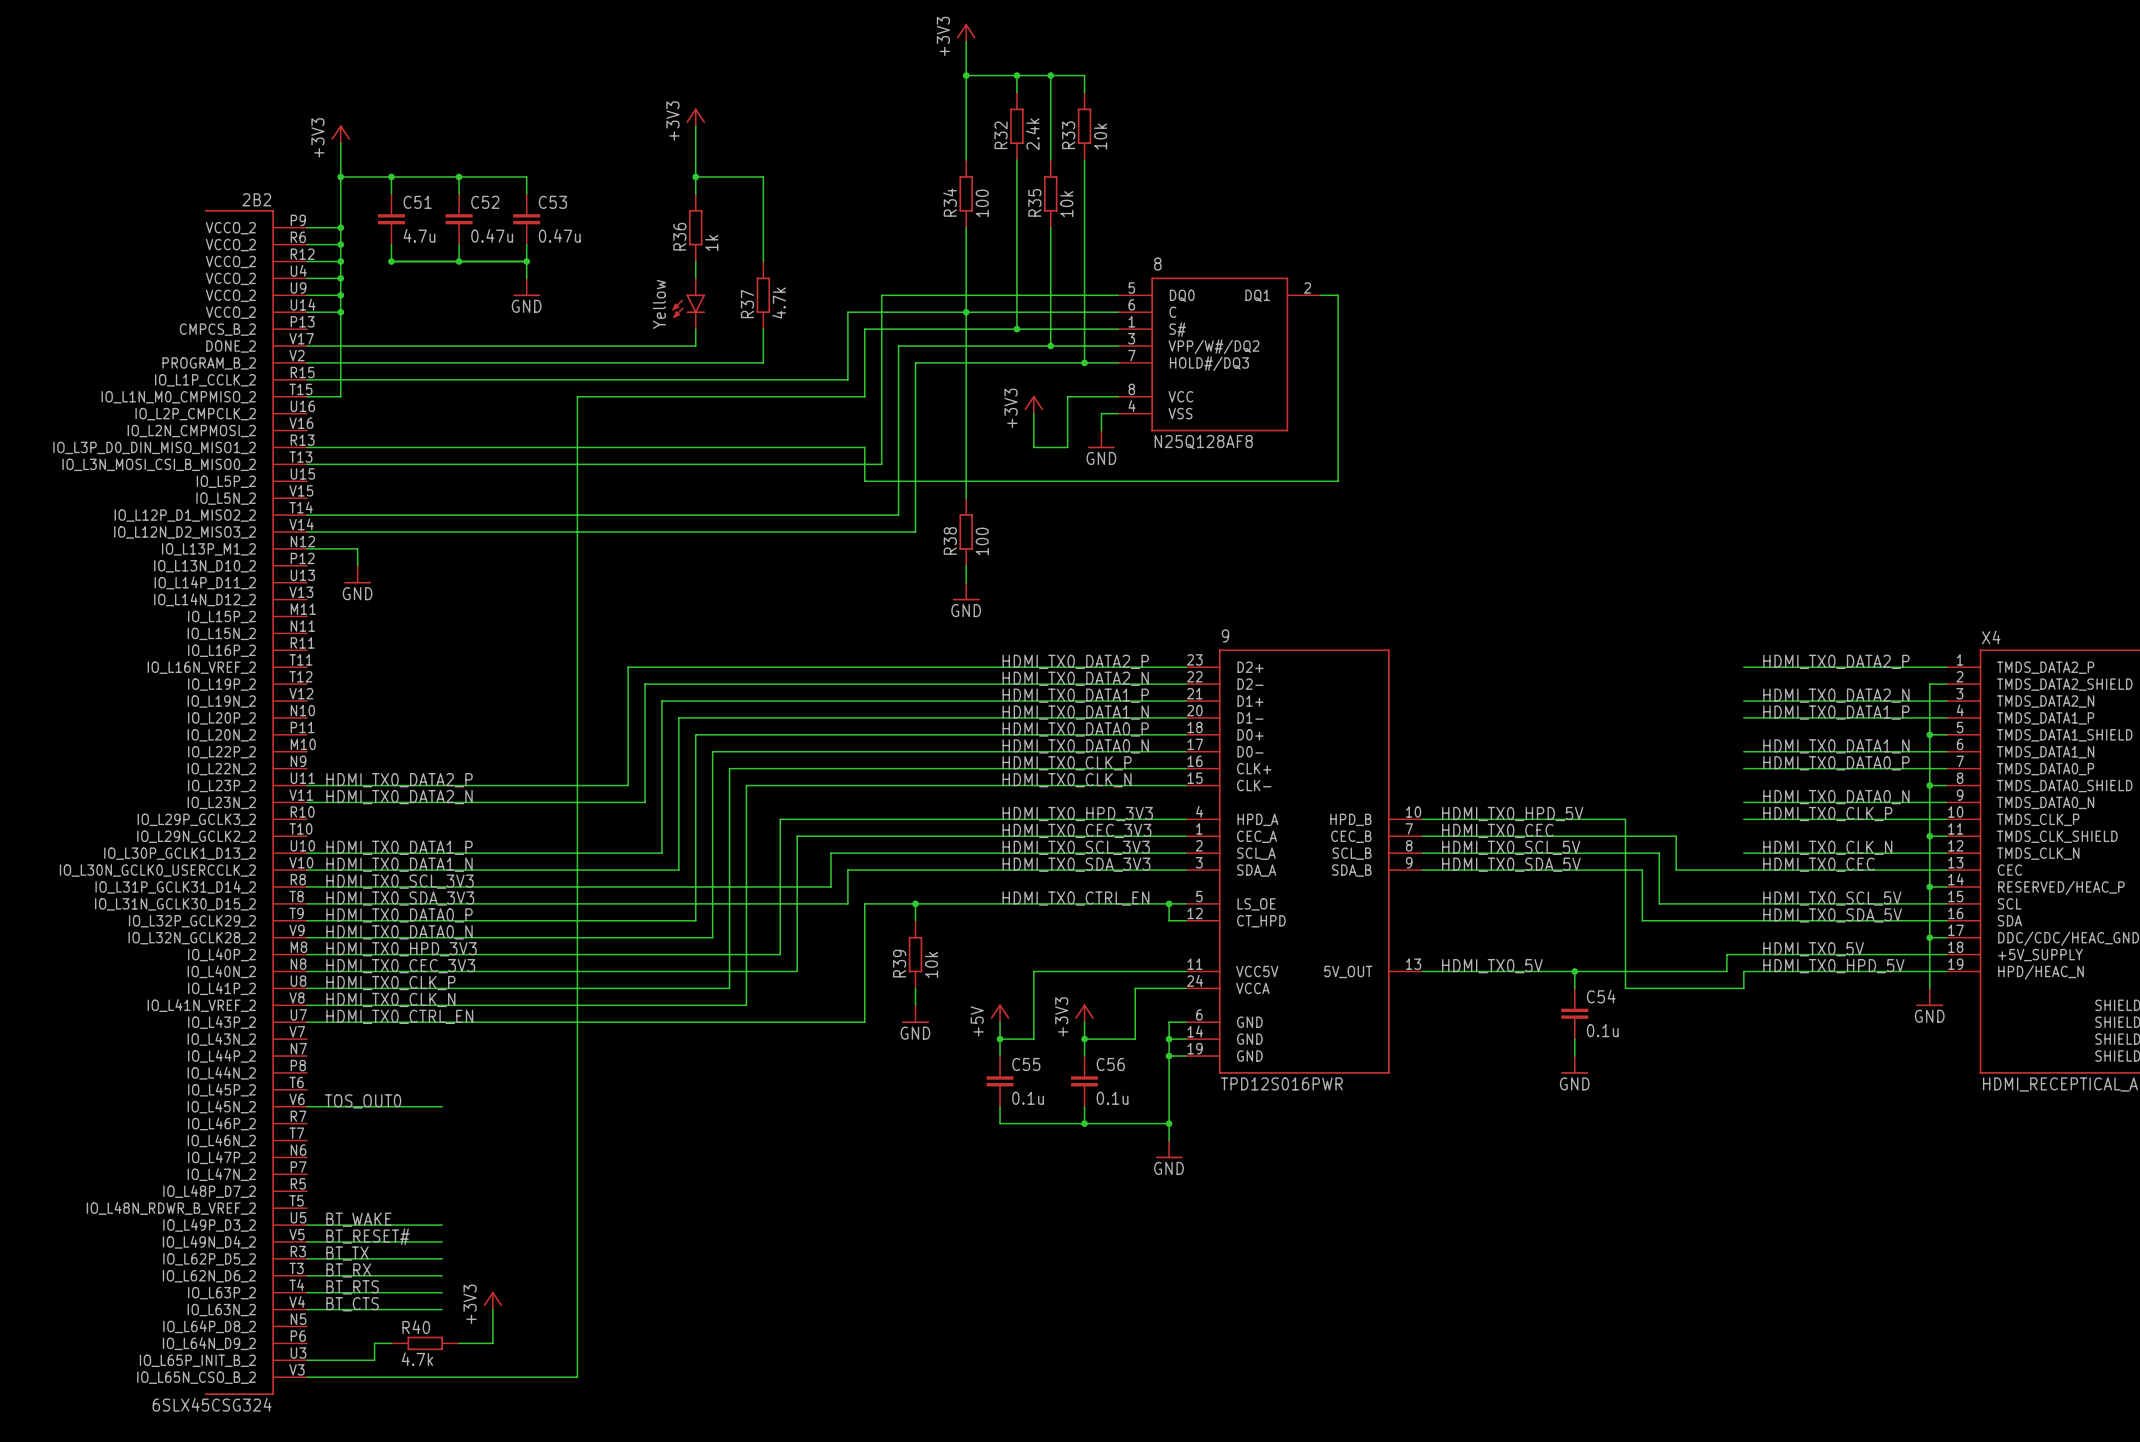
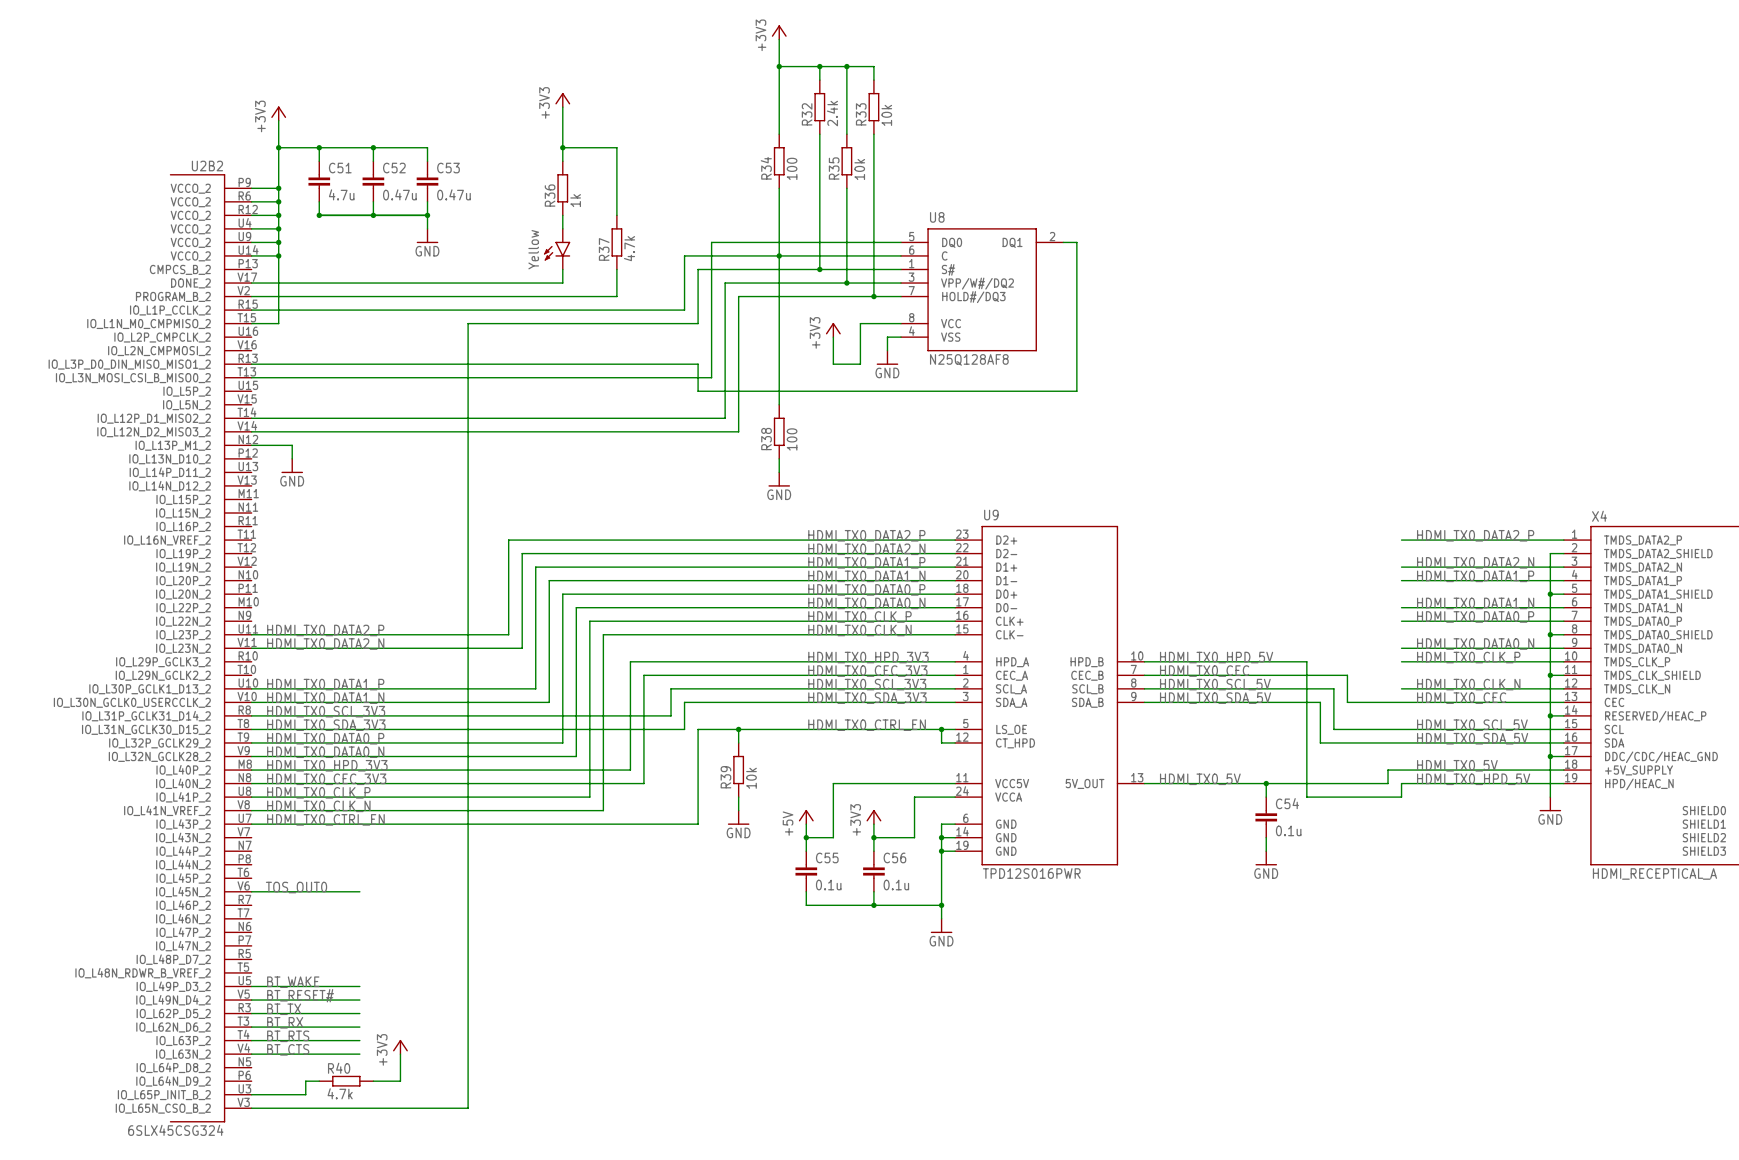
2B2 name: 2B2 (256, 199) -> U2B2 (207, 166)
8 name: 8 (1157, 264) -> U8 (937, 217)
9 name: 9 (1225, 635) -> U9 (991, 515)

